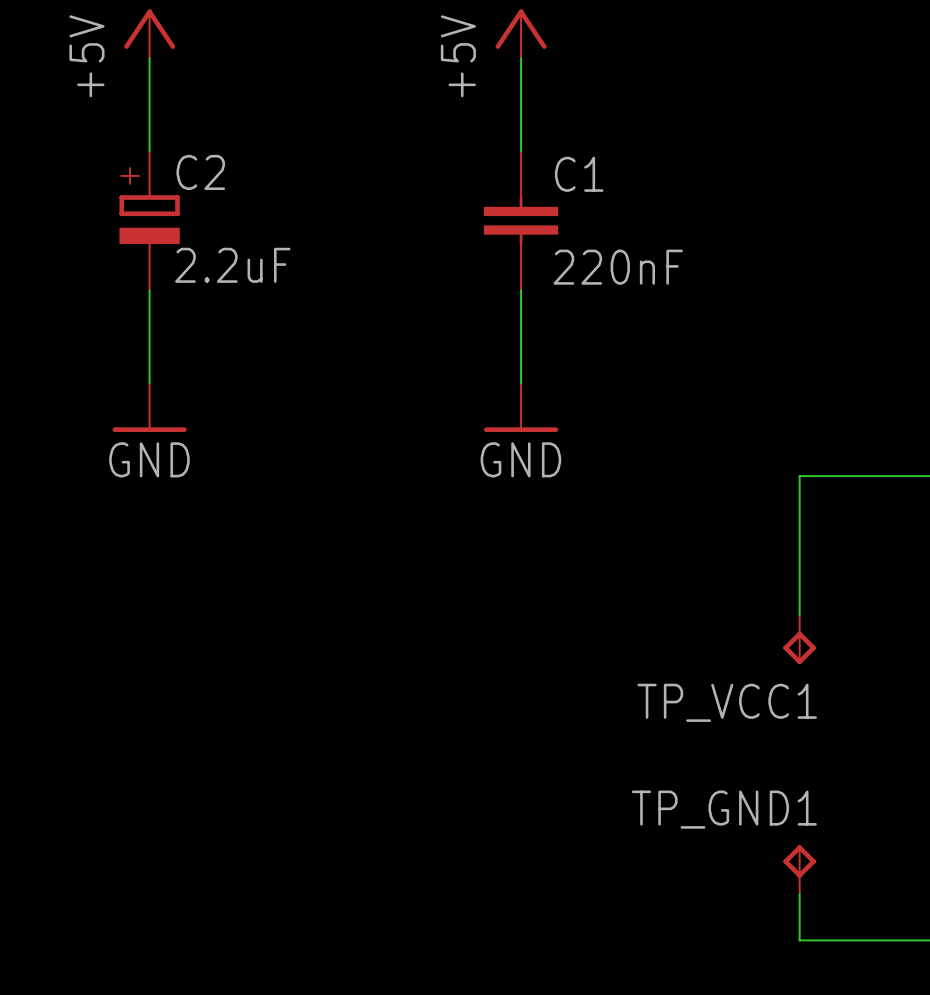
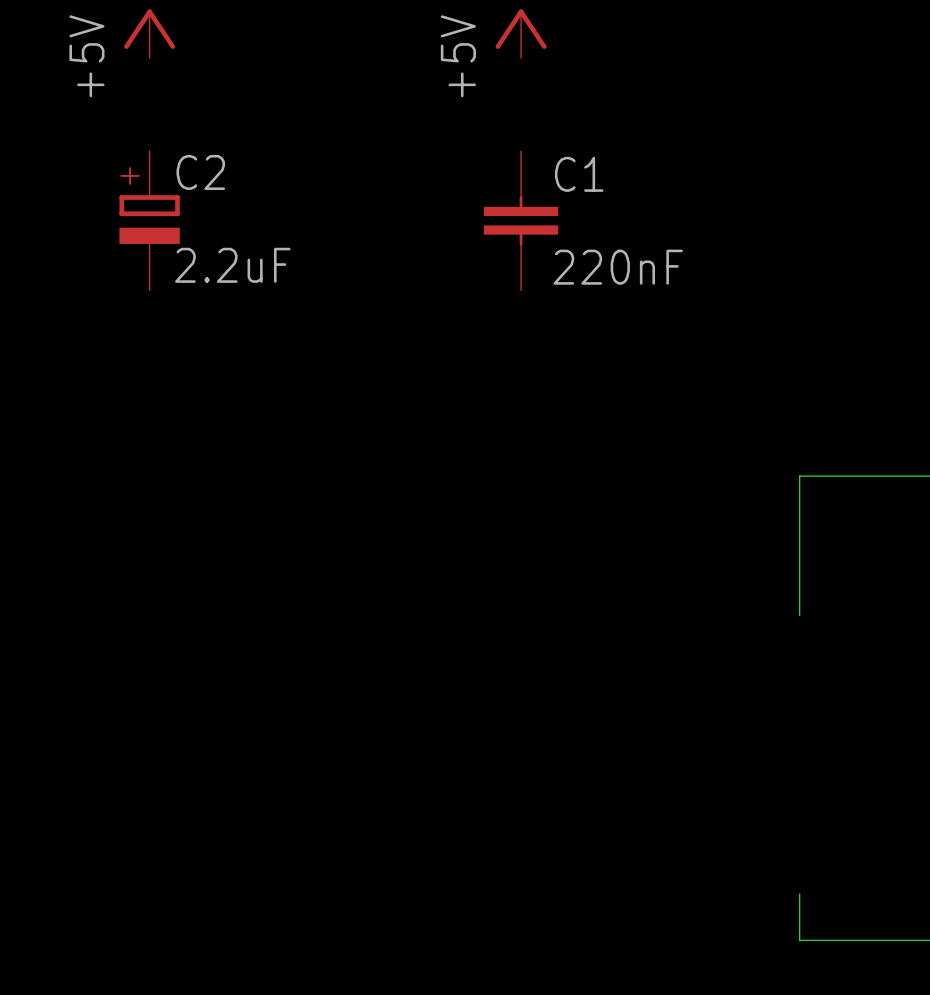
wire: (149, 58) (149, 151) -> none
wire: (521, 58) (521, 151) -> none
wire: (149, 290) (149, 383) -> none
wire: (521, 290) (521, 383) -> none
power symbol: GND (149, 407) -> none
power symbol: GND (521, 407) -> none
TP_VCC1: (799, 639) -> none
TP_GND1: (799, 869) -> none

